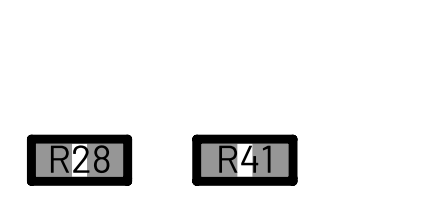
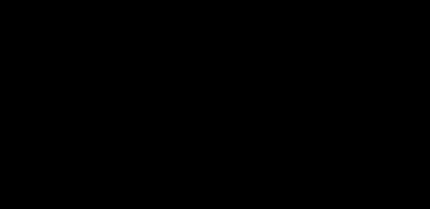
R28: (79, 160) -> none
R41: (244, 160) -> none

